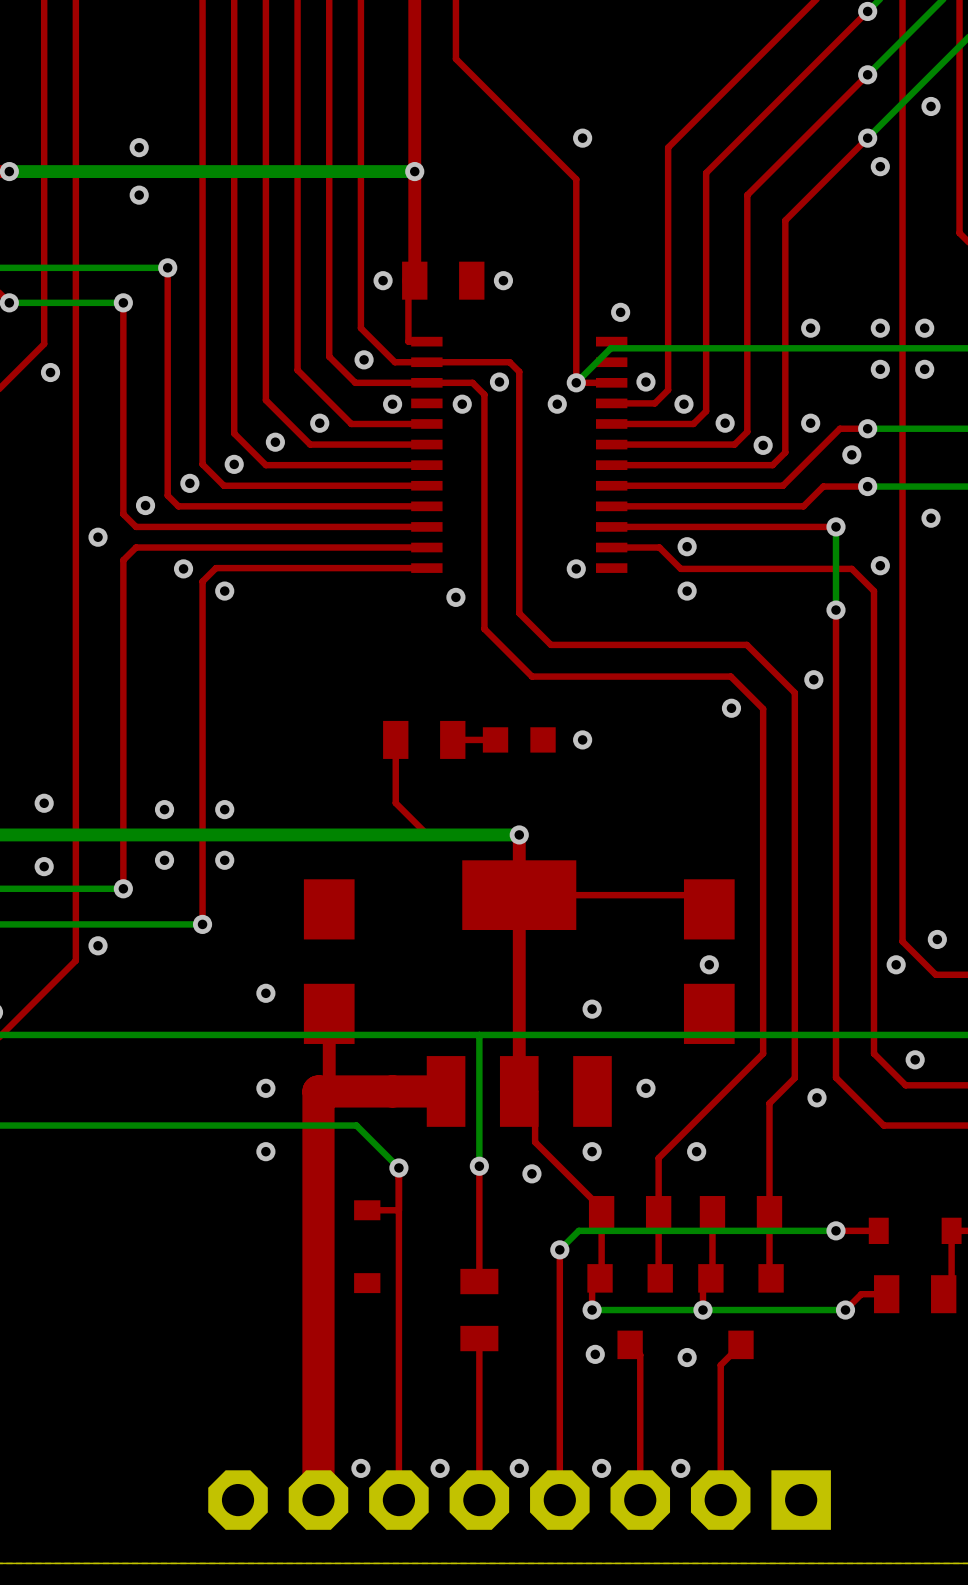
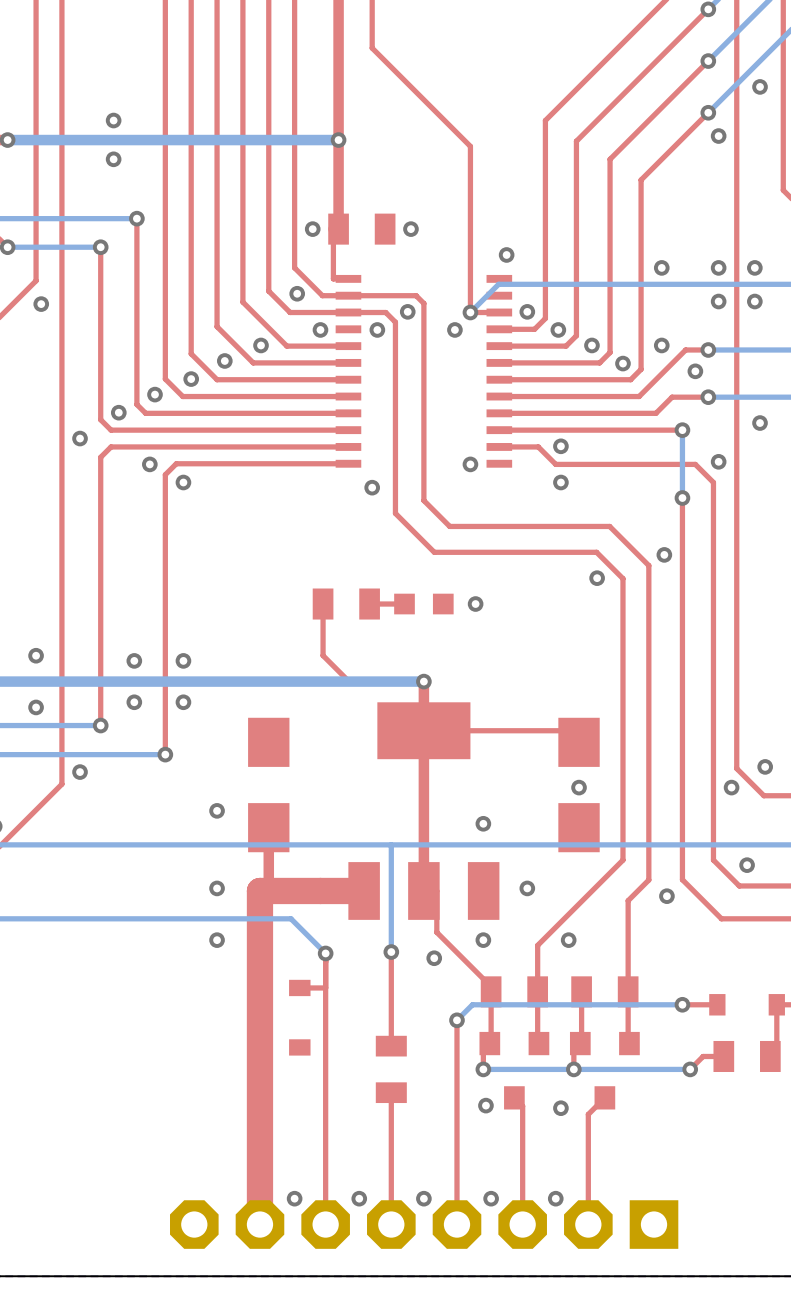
via: (582, 138) -> none

